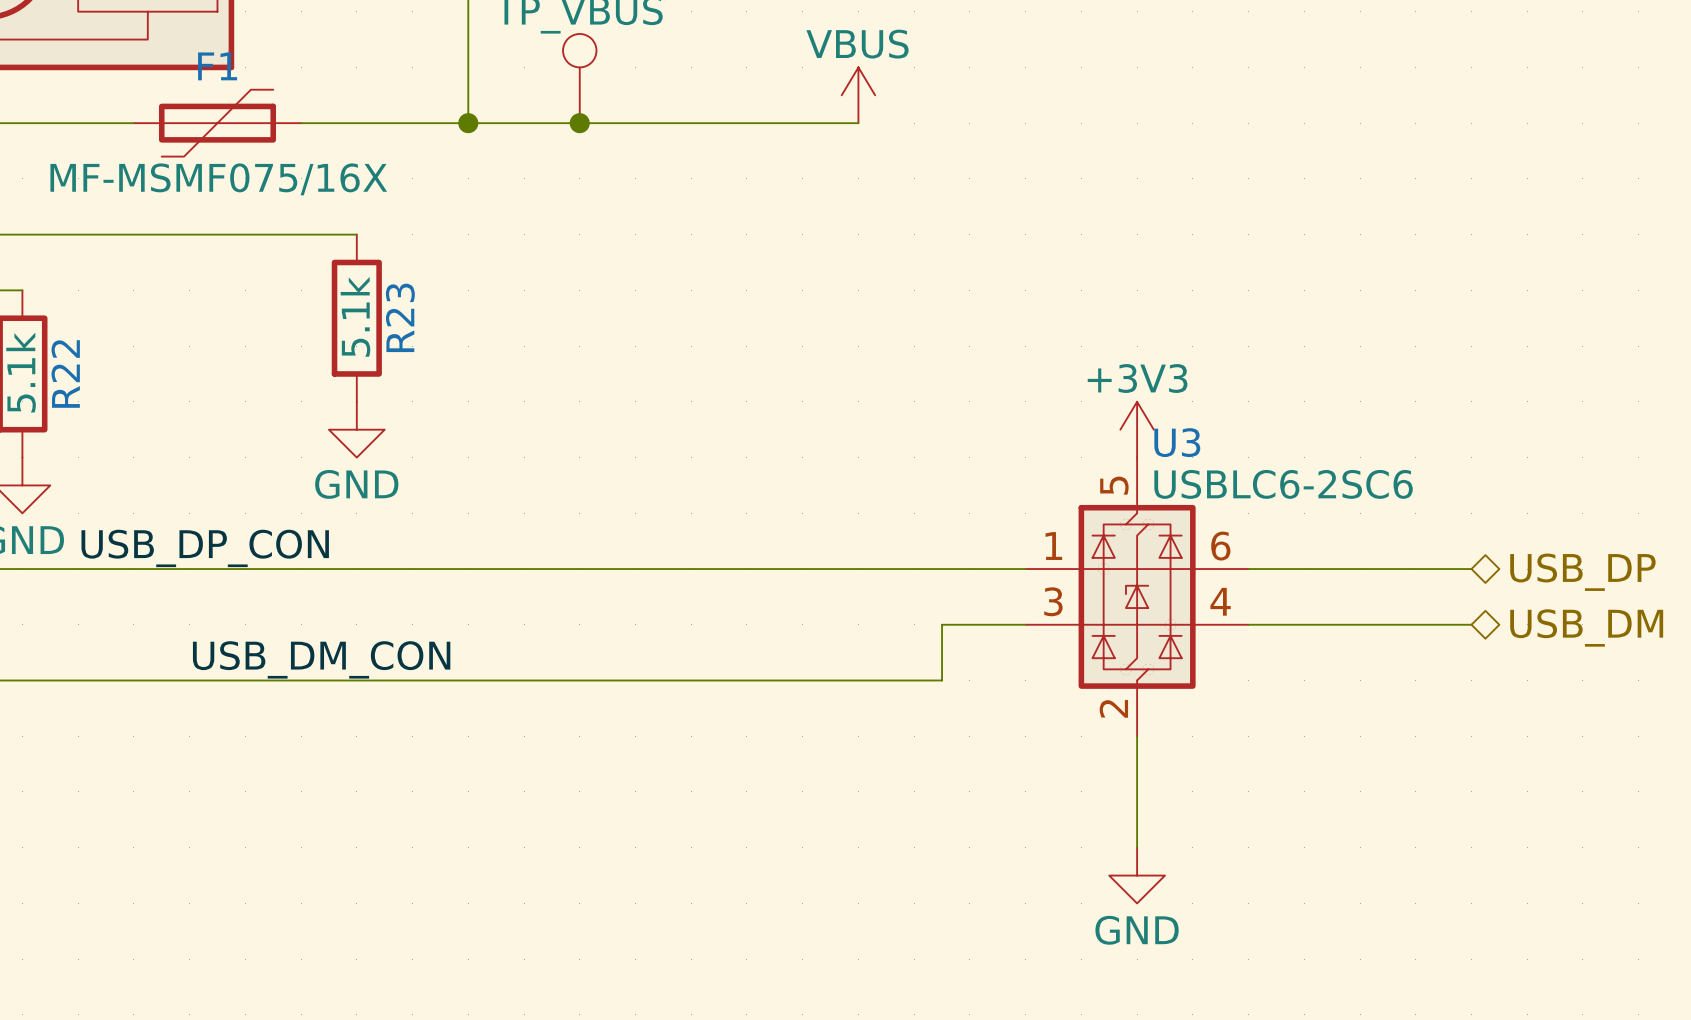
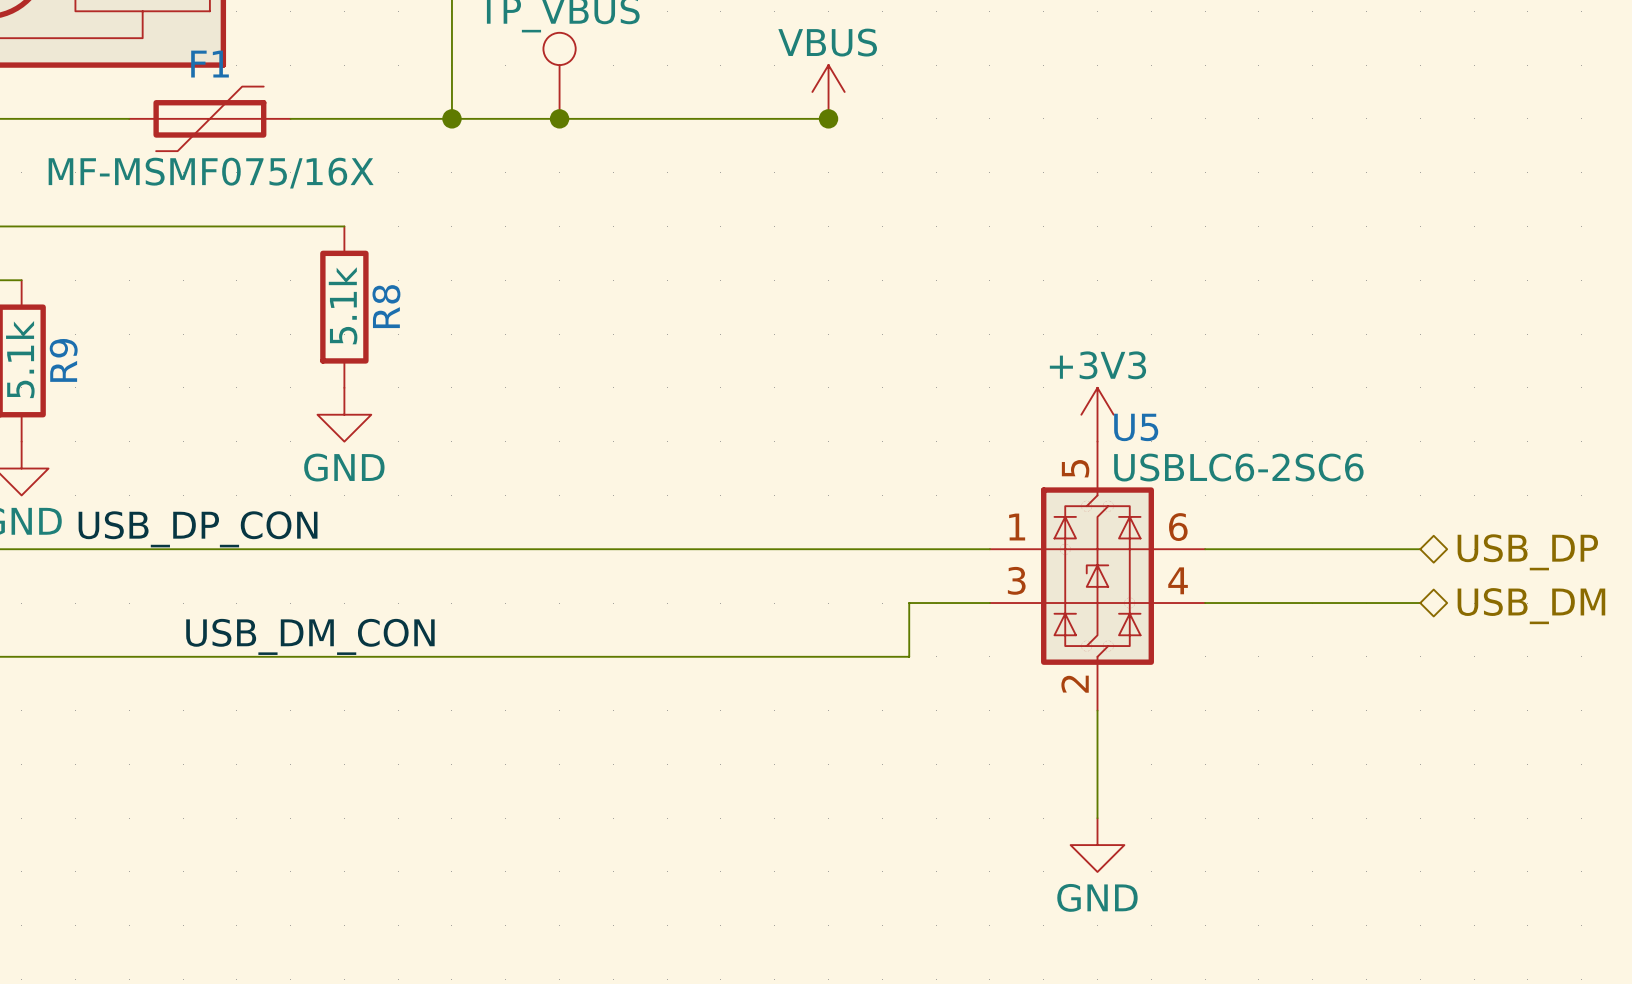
junction: none -> (828, 118)
R23 name: R23 (400, 317) -> R8 (386, 306)
R22 name: R22 (65, 374) -> R9 (63, 360)
U3 name: U3 (1177, 442) -> U5 (1136, 427)

